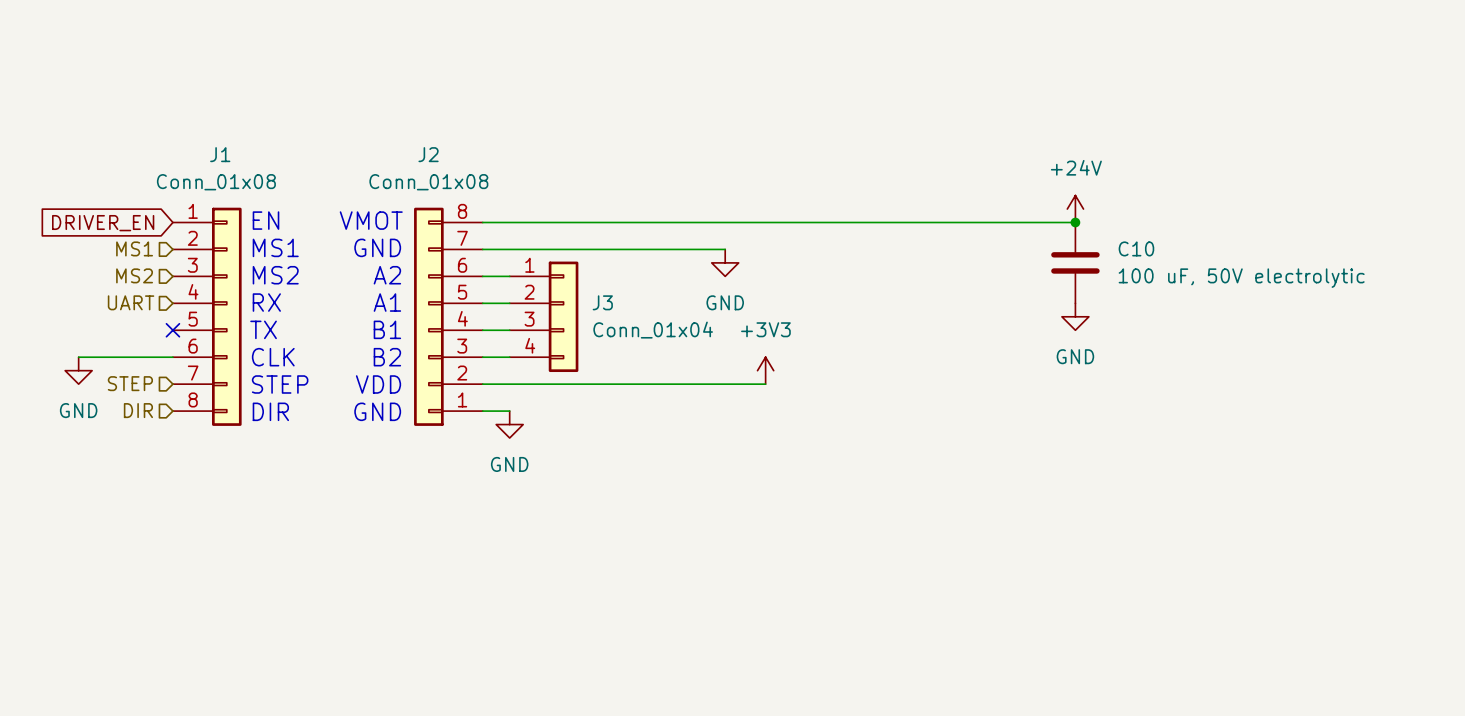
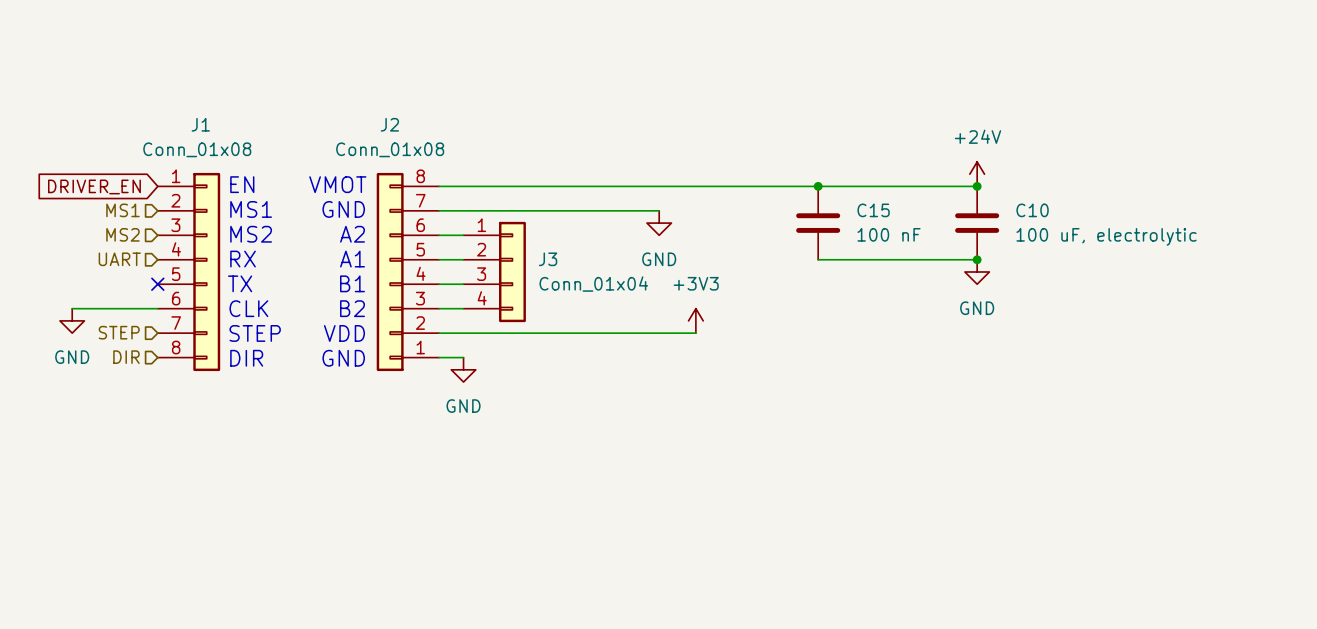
junction: none -> (818, 186)
C15: none -> 100 nF (818, 223)
C10 value: 100 uF, 50V electrolytic (1241, 278) -> 100 uF, electrolytic (1106, 236)
wire: none -> (818, 259) (977, 259)
junction: none -> (977, 259)

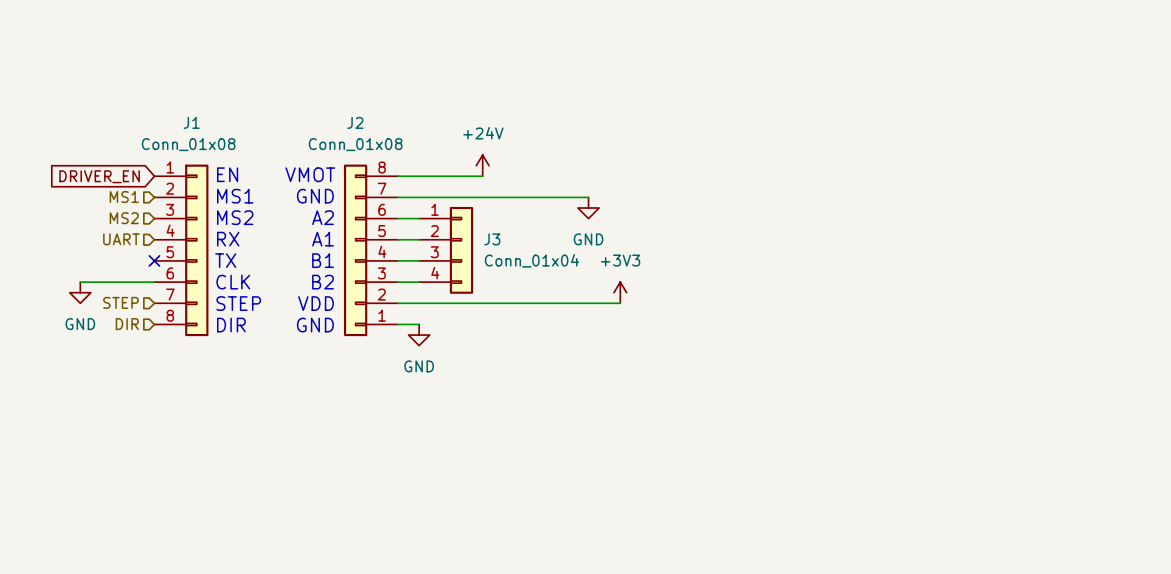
power symbol: none -> +24V (482, 165)
power symbol: +24V (977, 174) -> none
wire: (536, 186) (977, 186) -> none
junction: (818, 186) -> none
junction: (977, 186) -> none
C15: 100 nF (818, 223) -> none
C10: 100 uF, electrolytic (977, 223) -> none
wire: (818, 259) (977, 259) -> none
junction: (977, 259) -> none
power symbol: GND (977, 271) -> none

